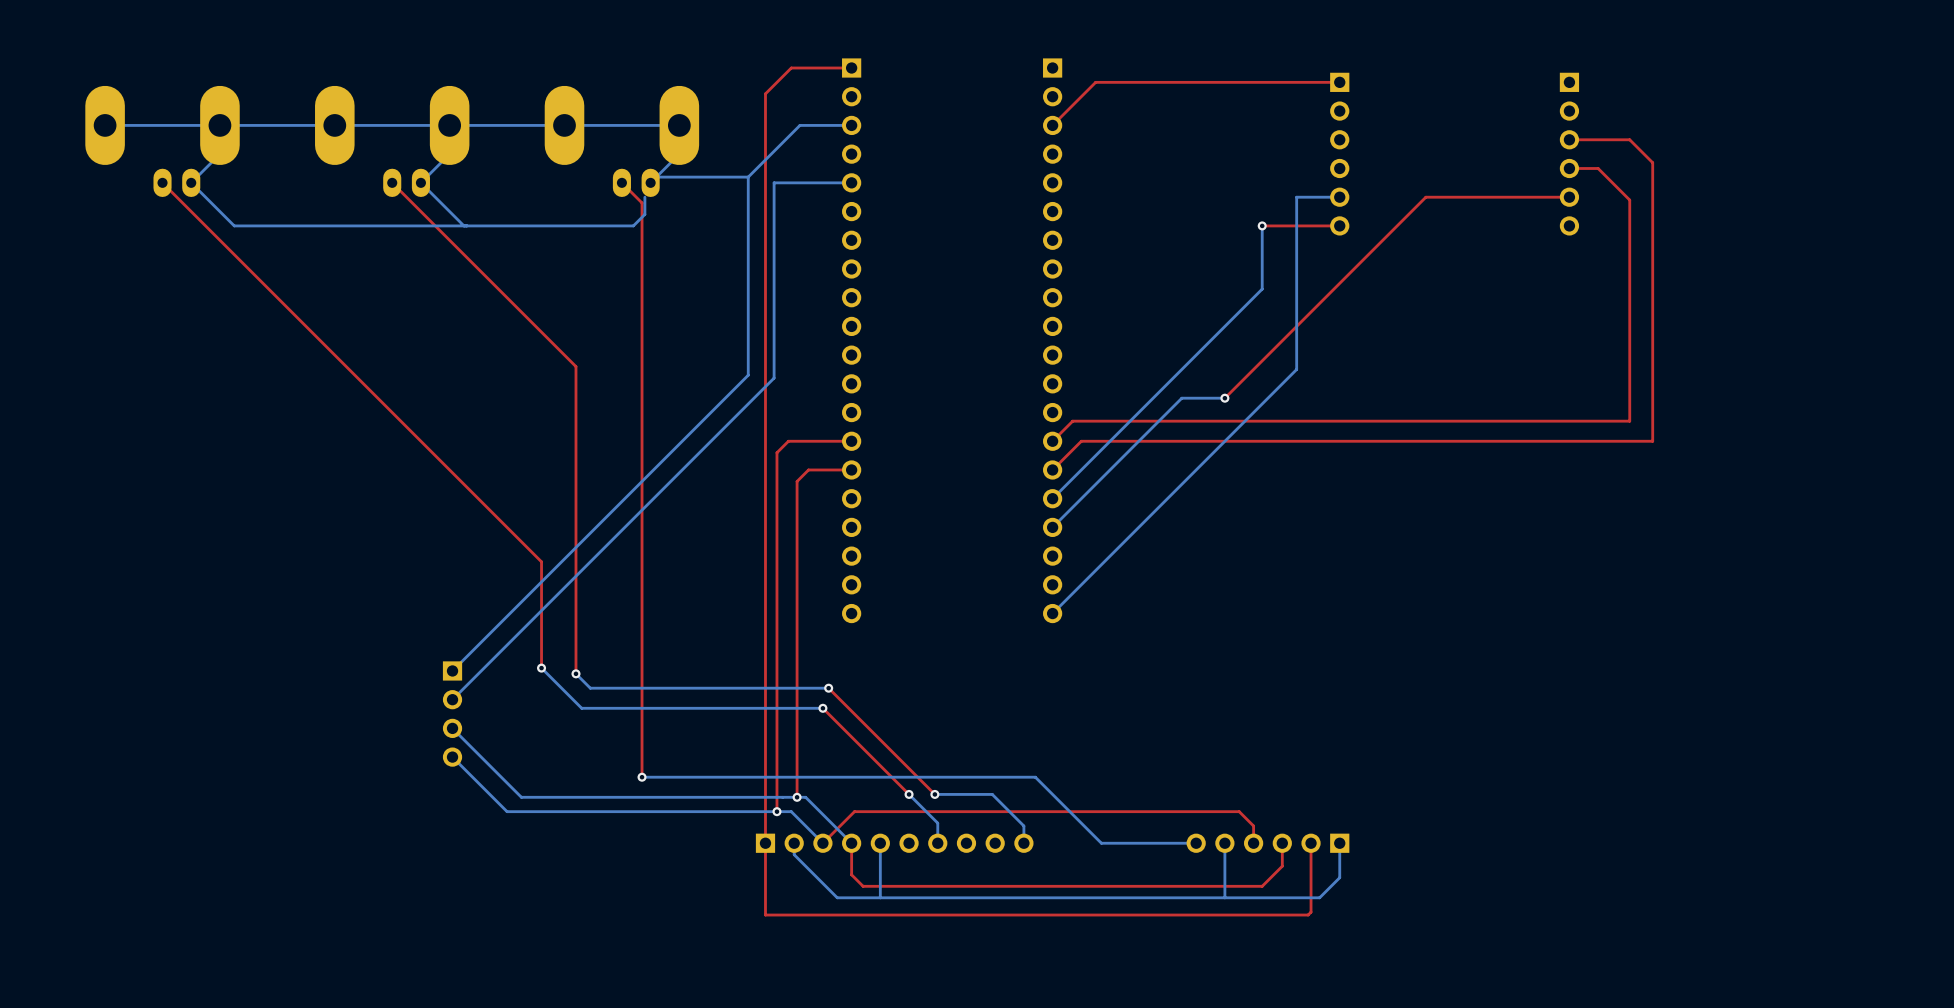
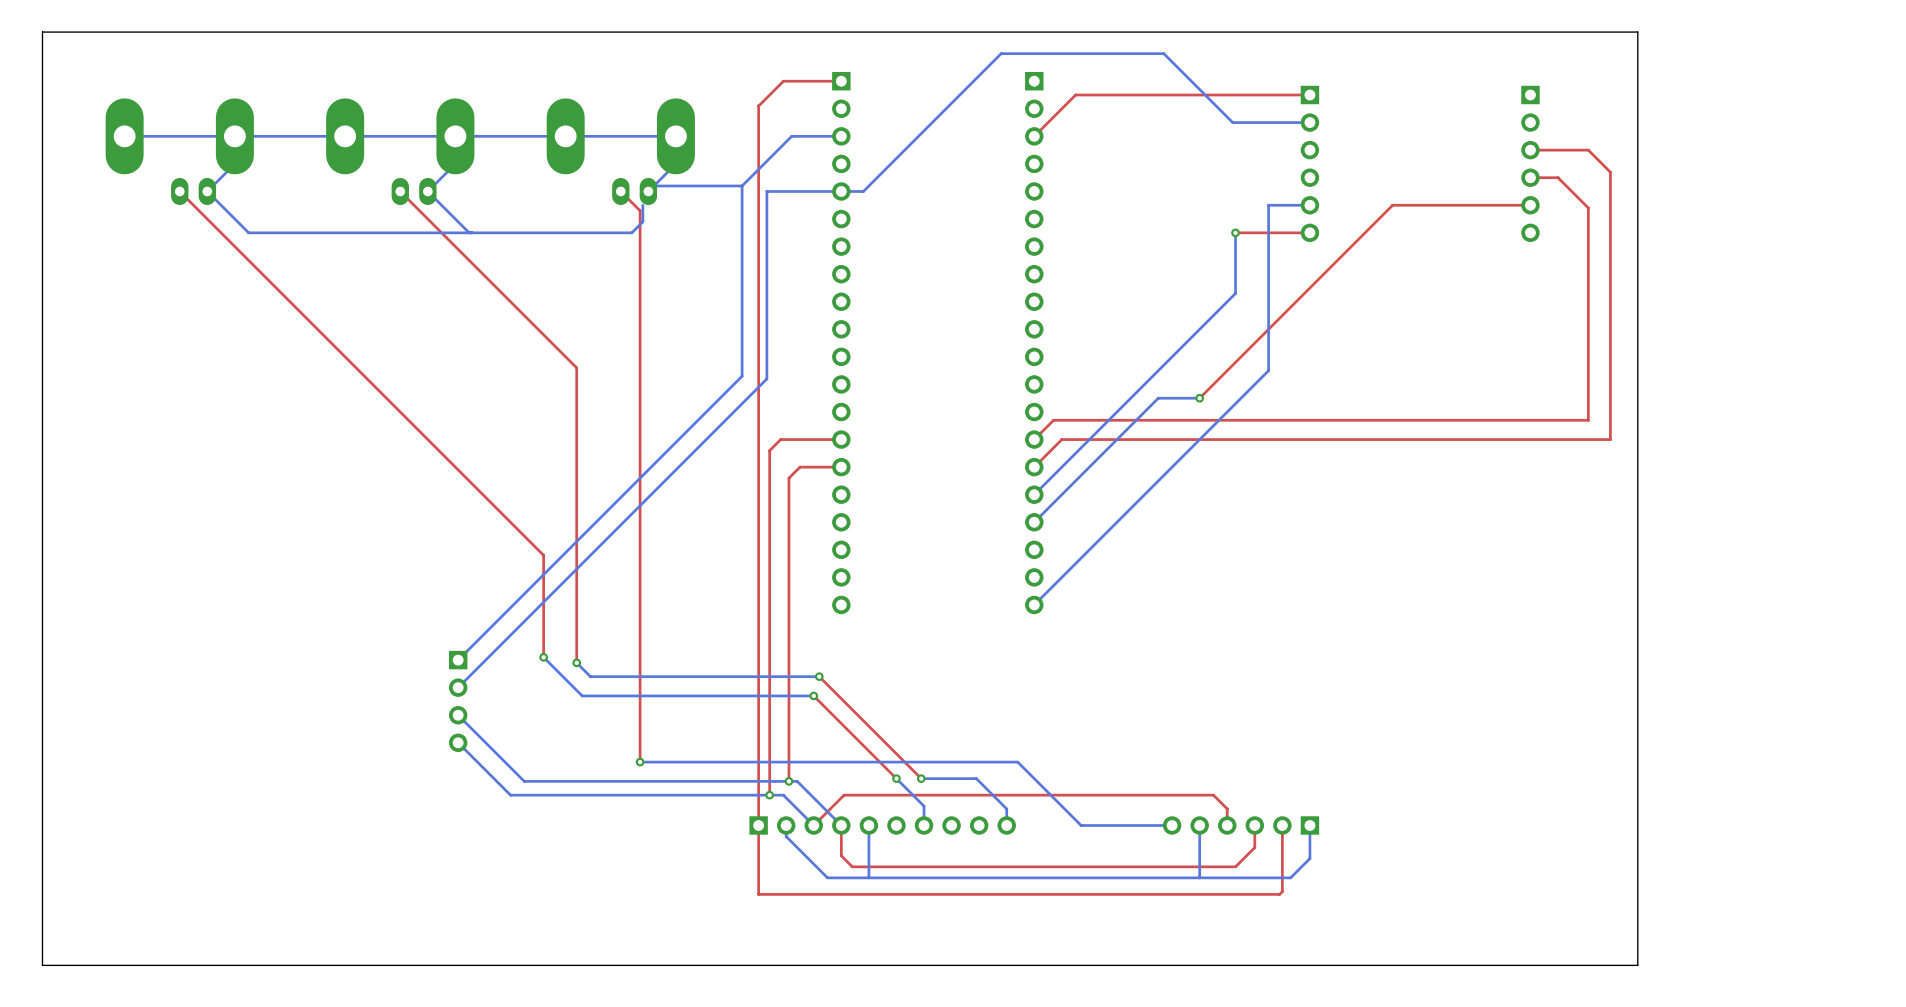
board edge: none -> (1637, 32) (42, 32) (42, 965) (1637, 965) (1637, 32)
bottom track: none -> (1309, 122) (1232, 122) (1163, 53) (1001, 53) (863, 191) (841, 191)

